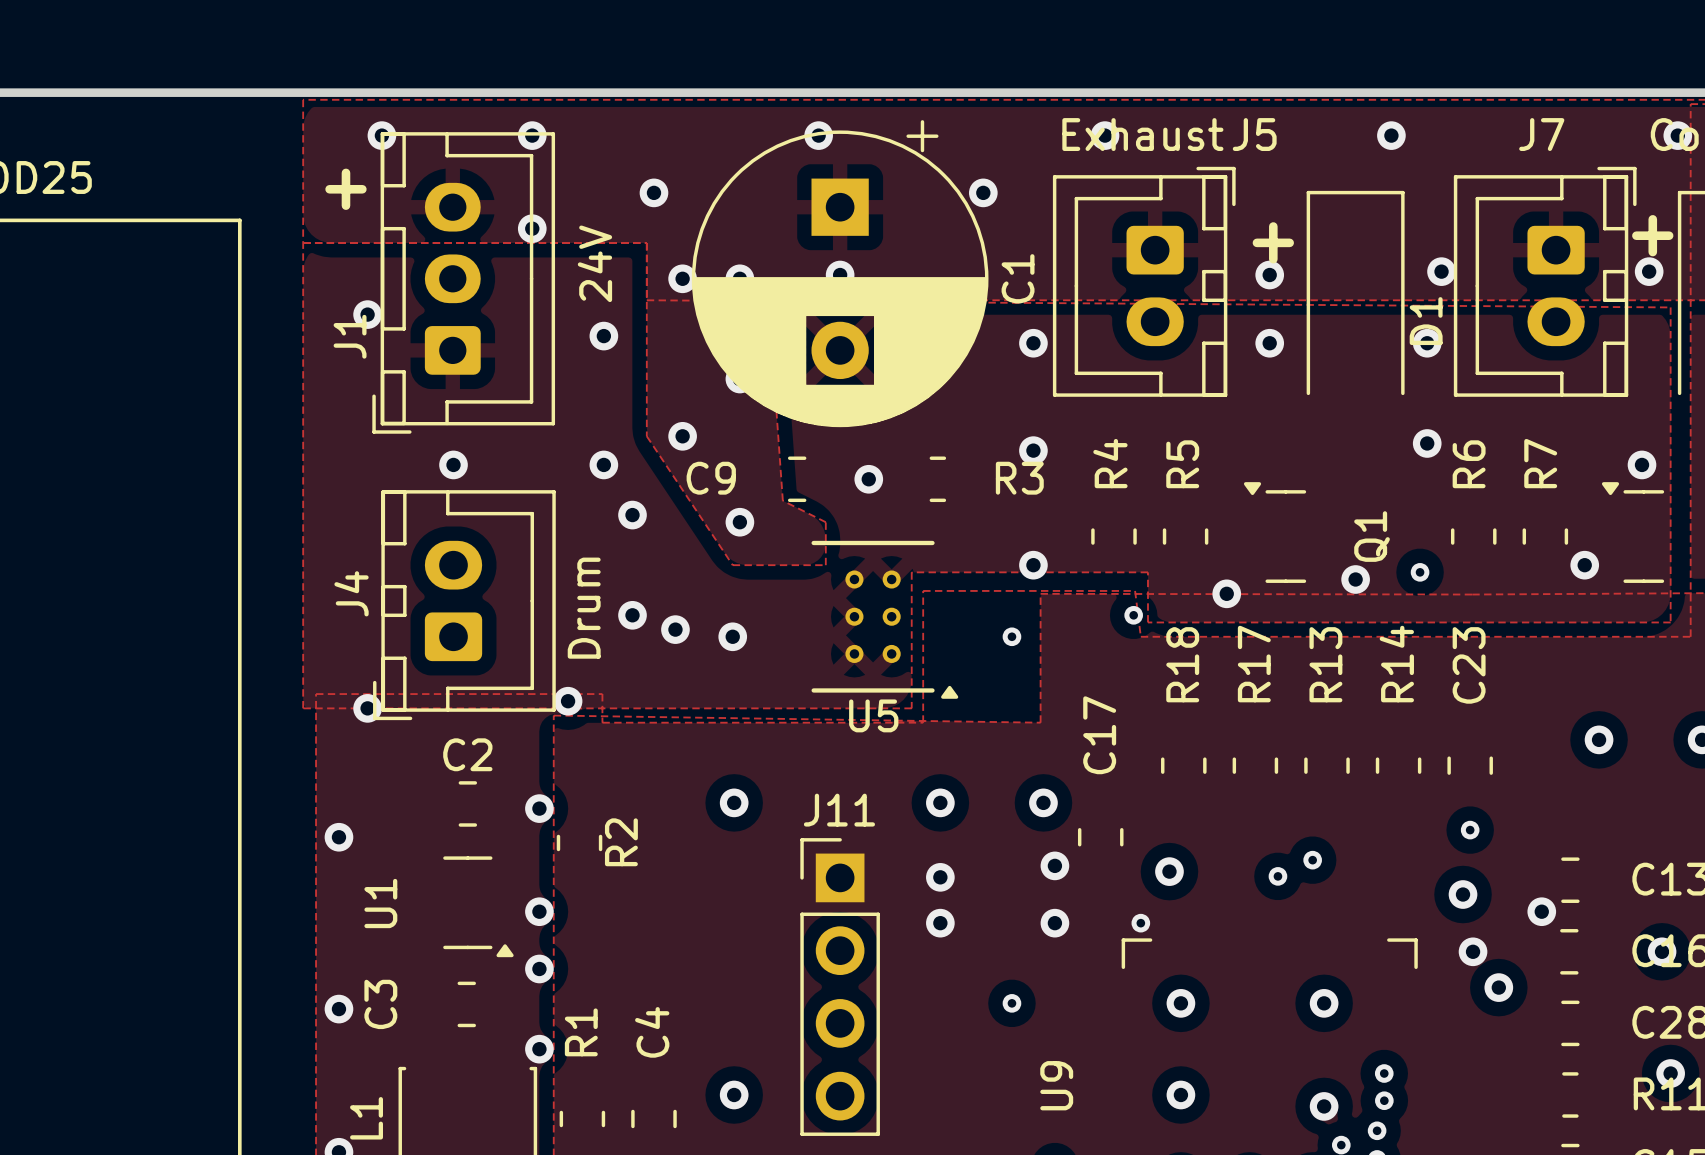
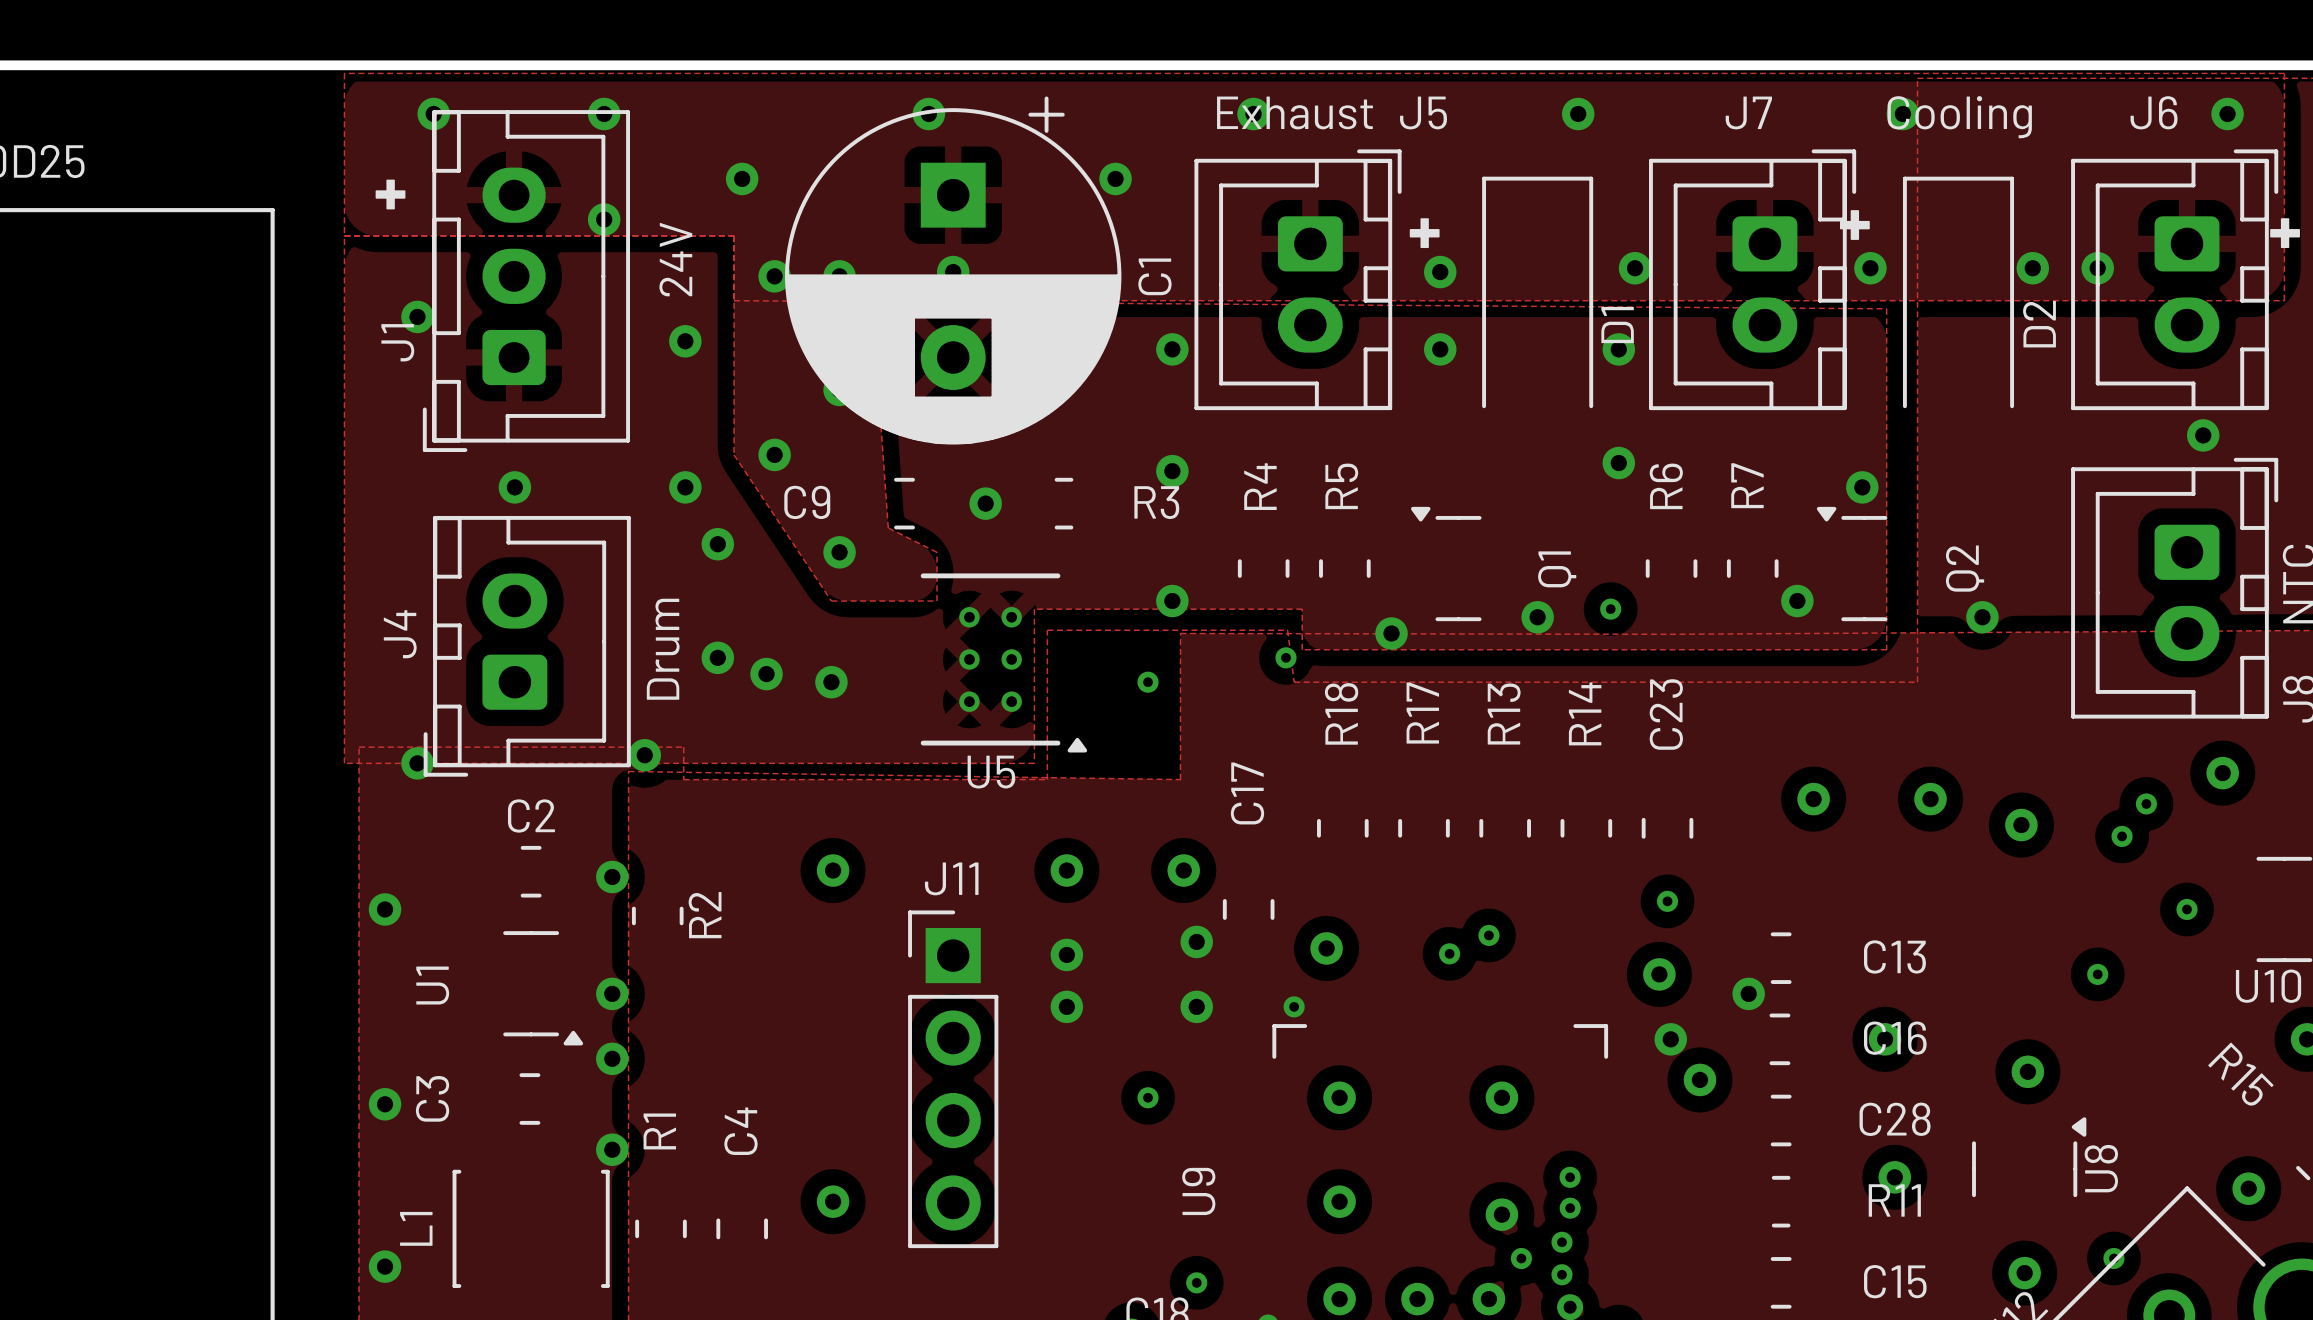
zone outline: (646, 300) (1670, 307) (1670, 622) (1147, 622) (1147, 608) -> (734, 300) (1886, 308) (1886, 649) (1302, 649)

